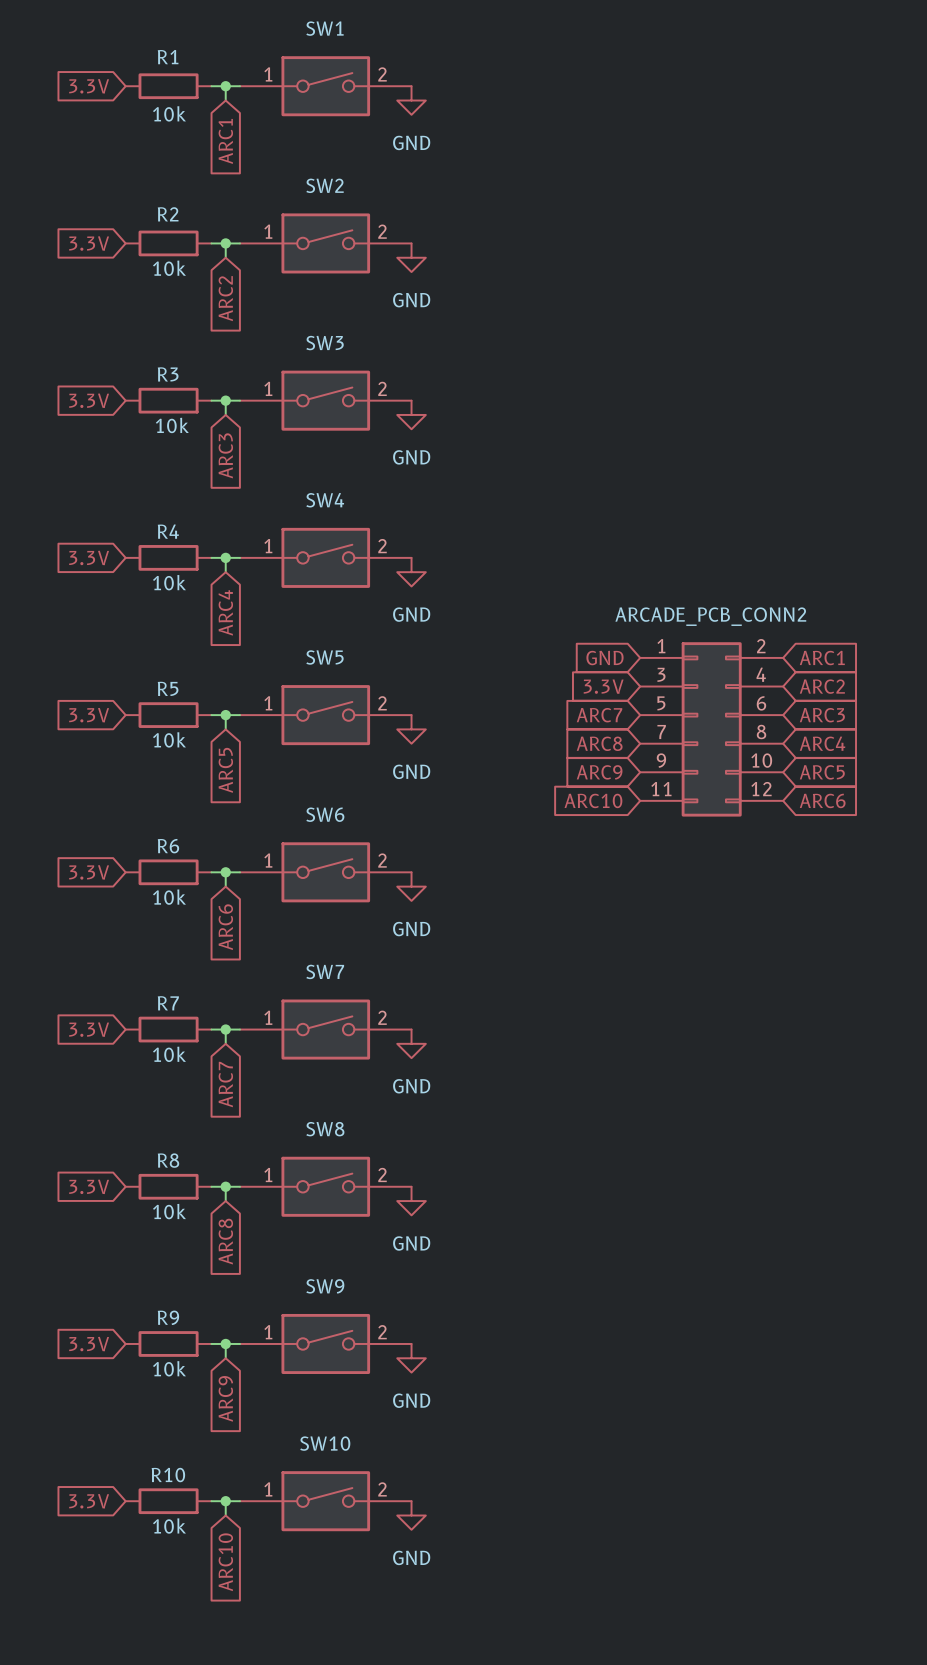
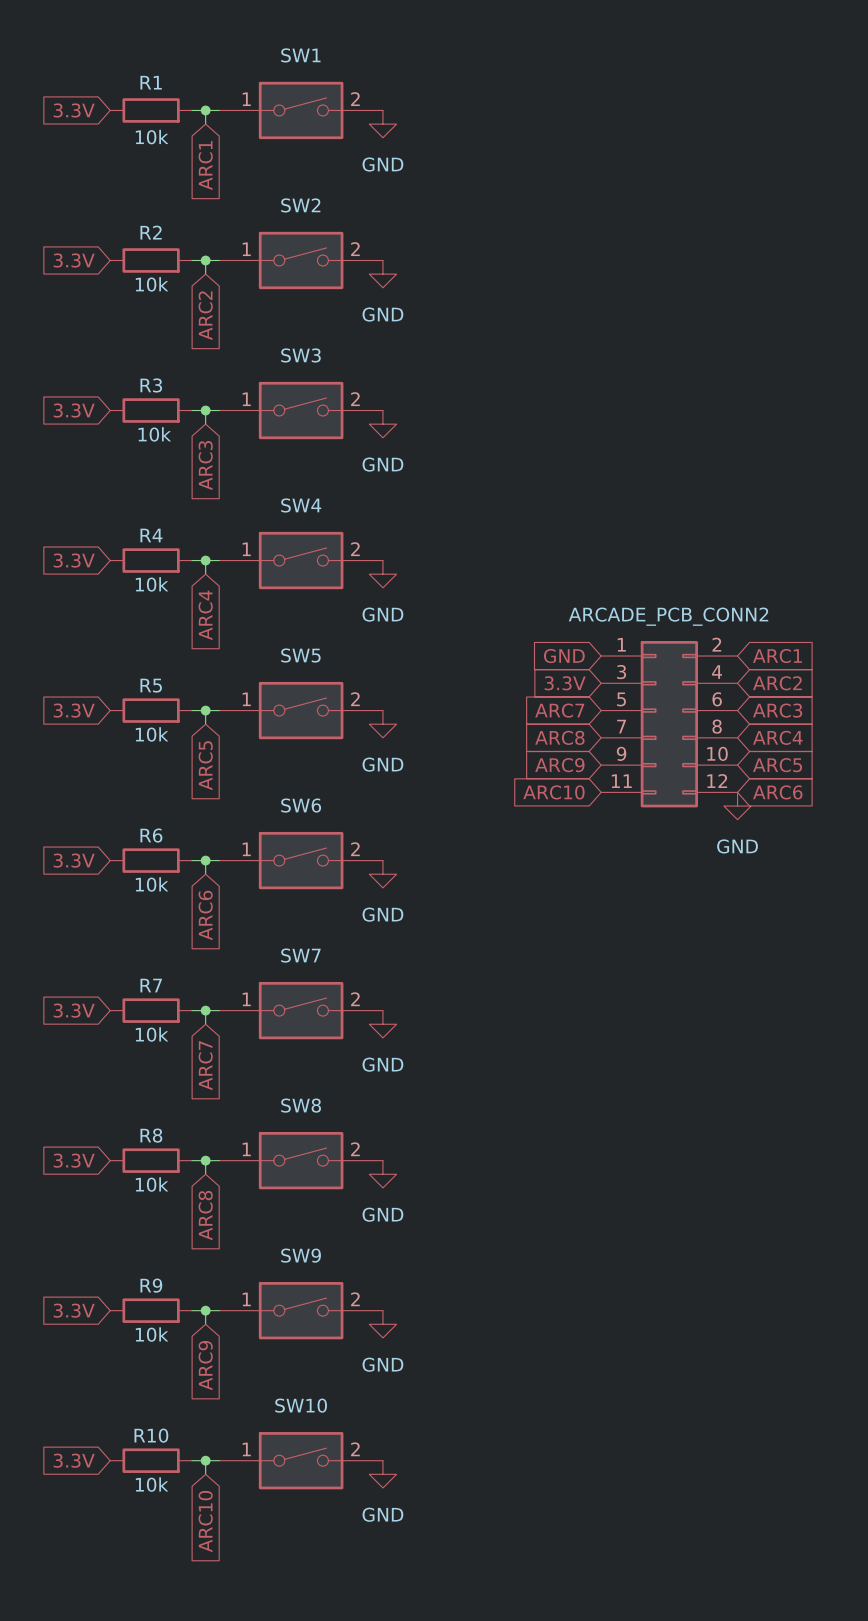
power symbol: none -> GND (737, 806)

